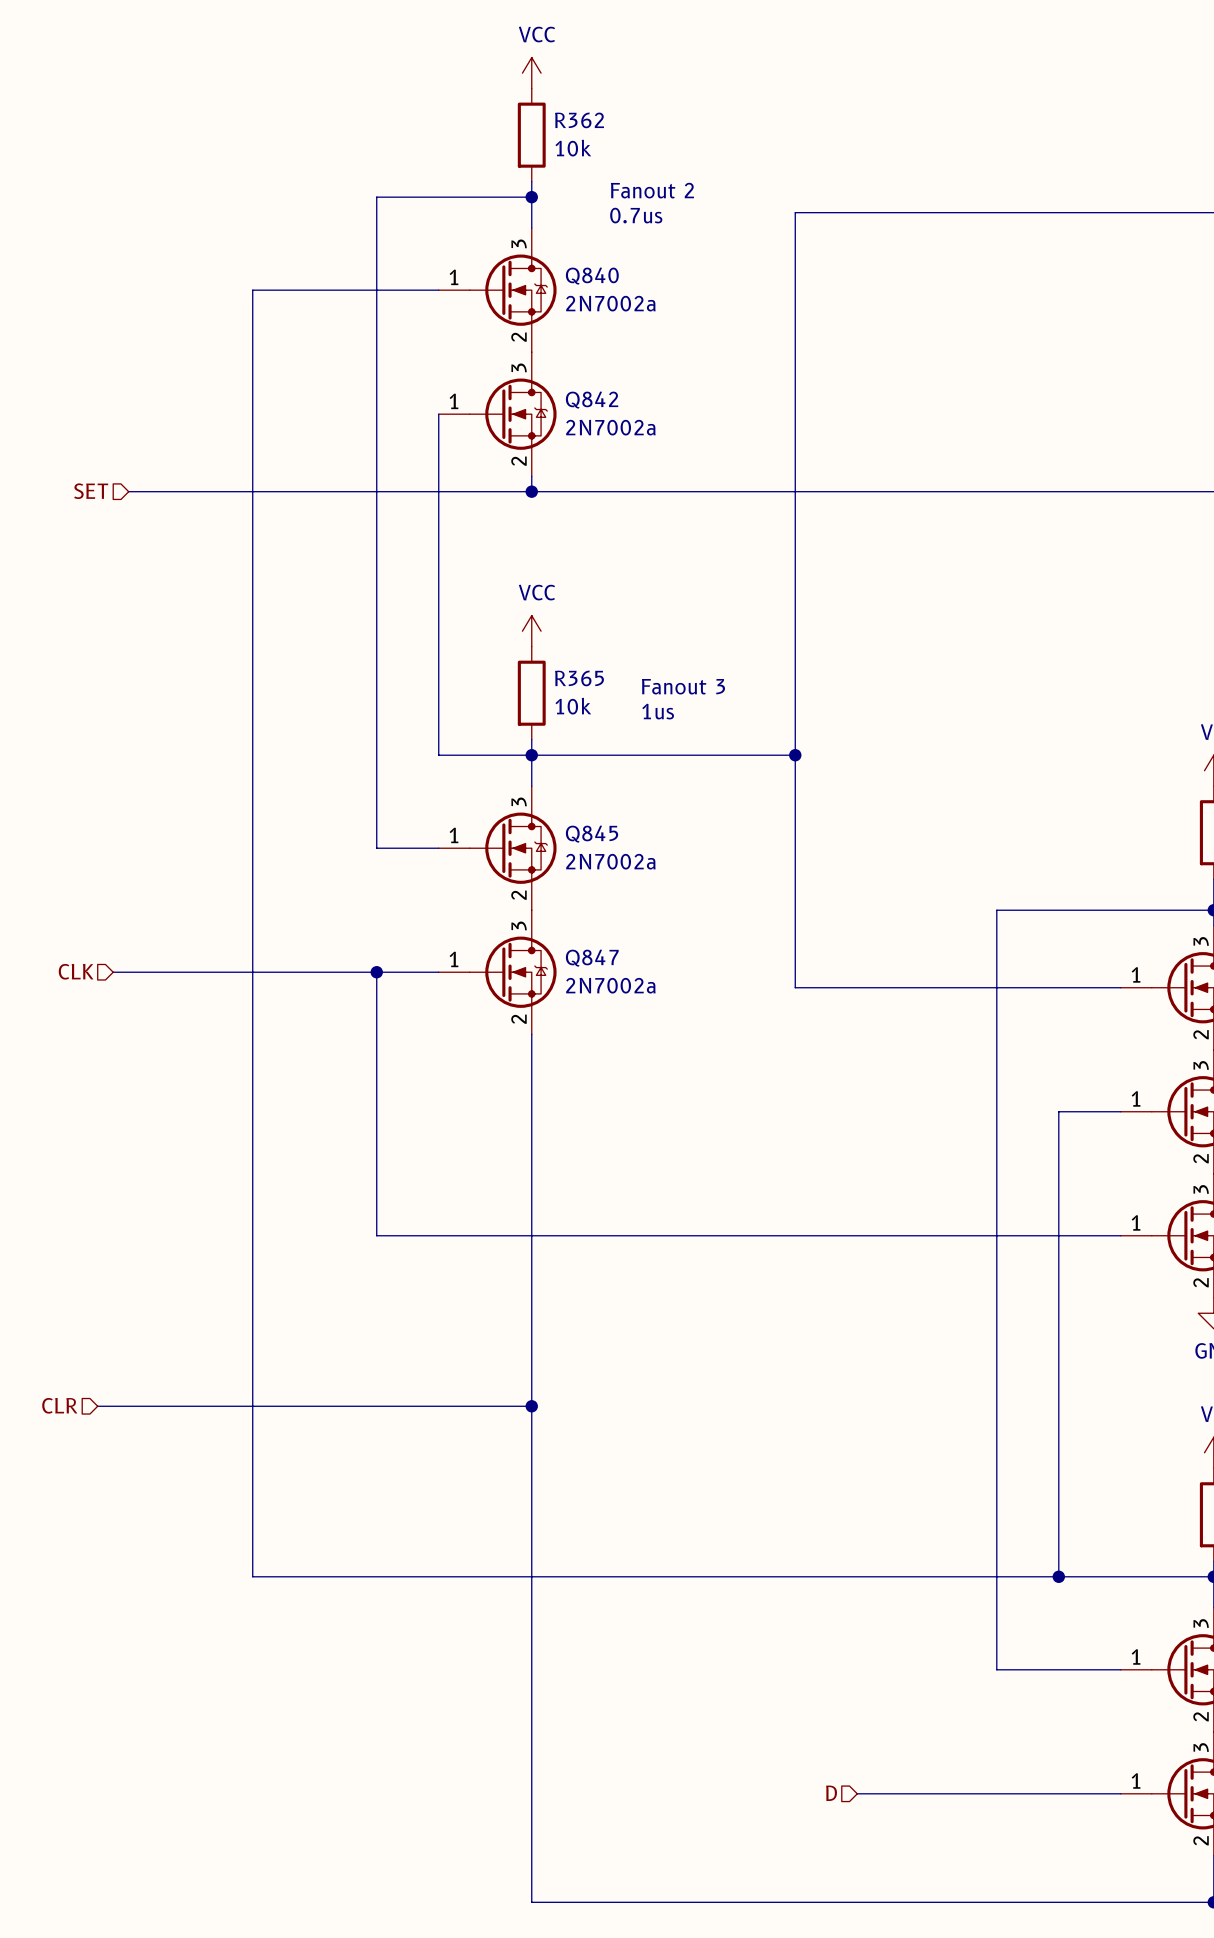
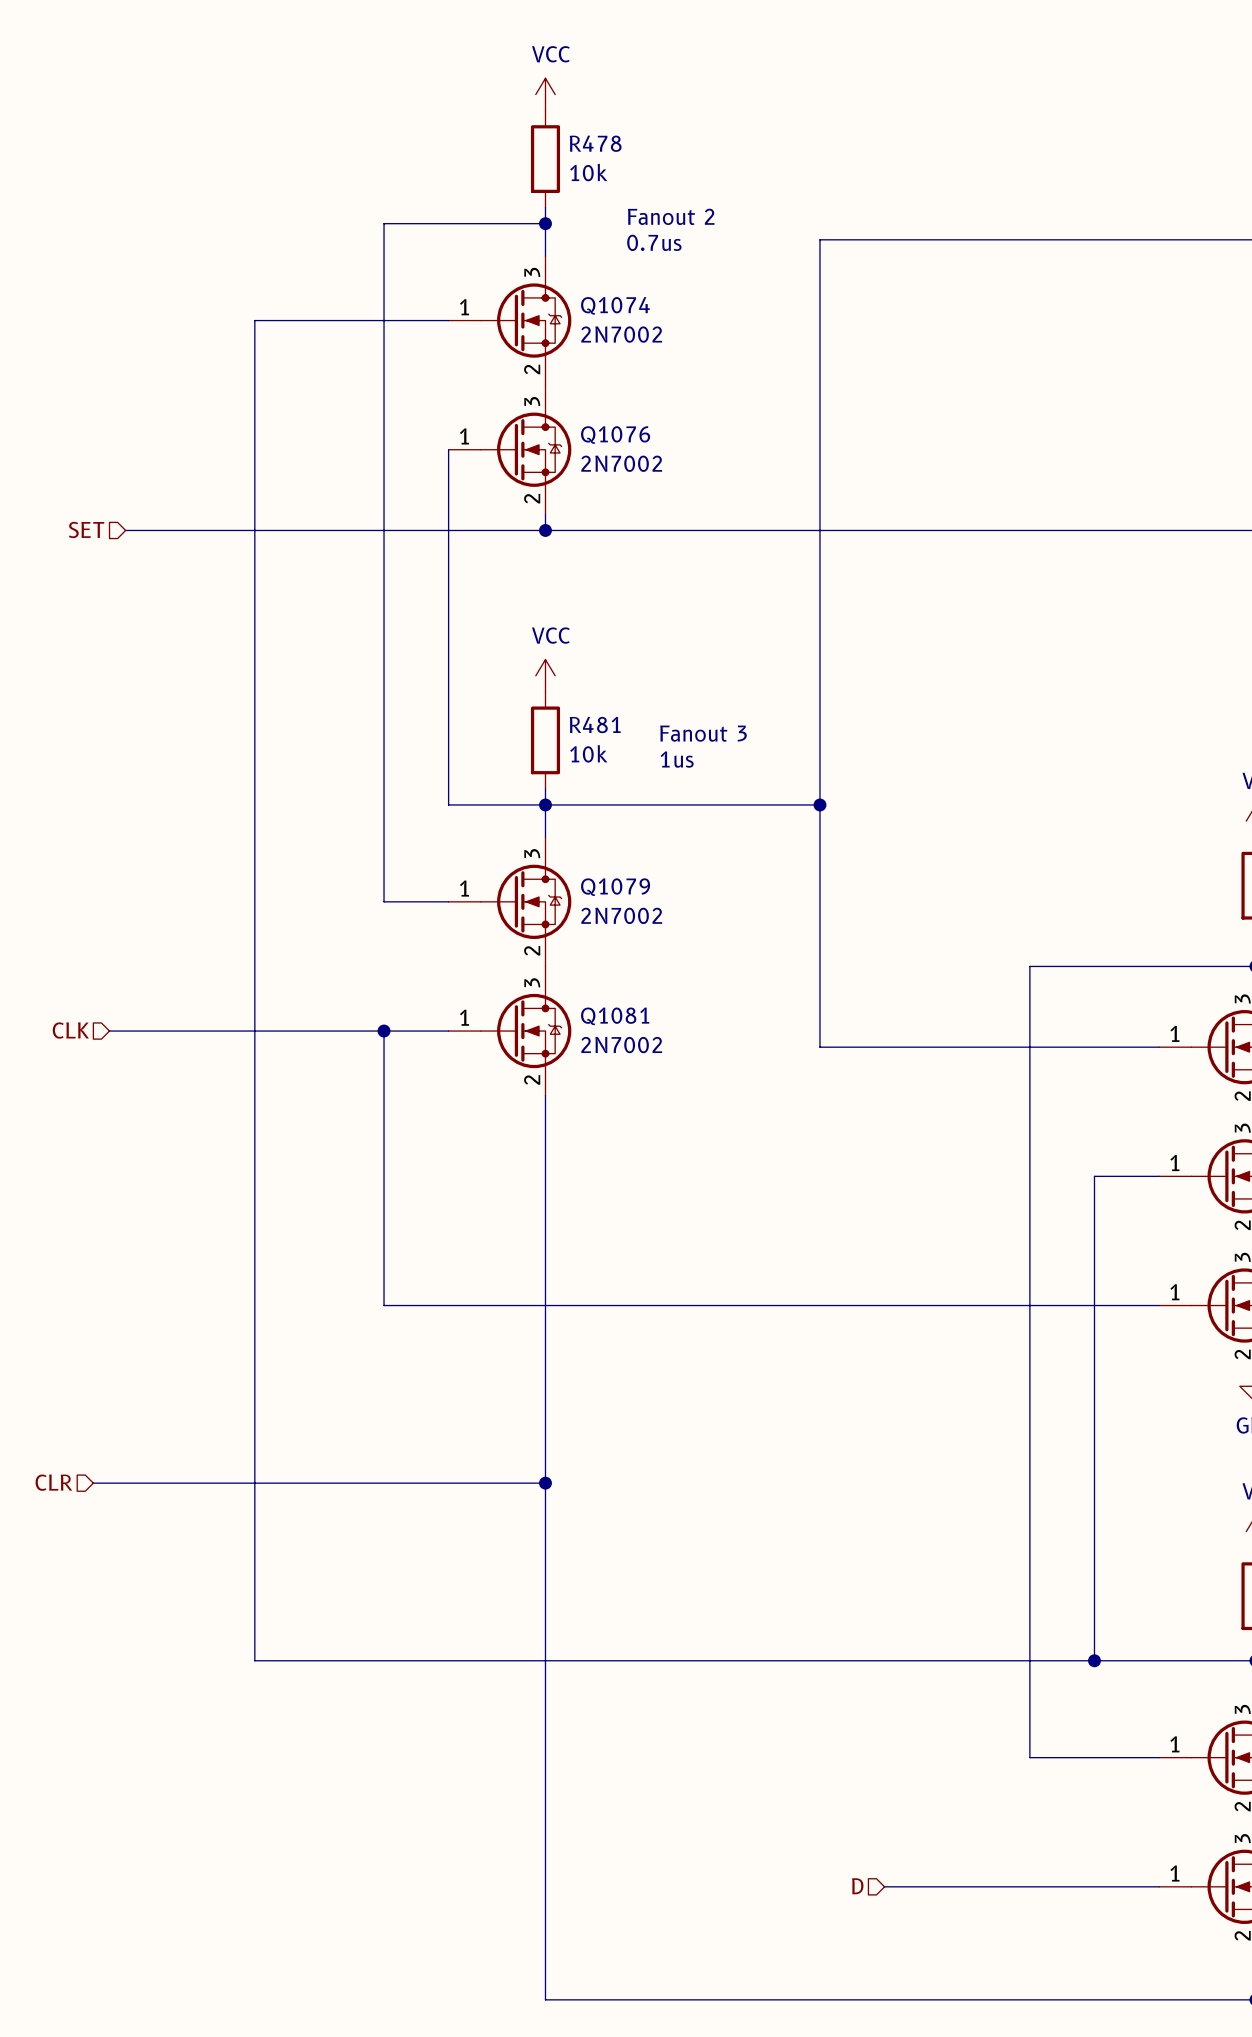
R362 name: R362 (579, 120) -> R478 (595, 143)
Q840 name: Q840 (592, 276) -> Q1074 (615, 305)
Q840 value: 2N7002a (610, 303) -> 2N7002 (621, 334)
Q842 name: Q842 (592, 400) -> Q1076 (615, 435)
Q842 value: 2N7002a (610, 427) -> 2N7002 (621, 463)
R365 name: R365 (579, 678) -> R481 (595, 725)
Q845 name: Q845 (592, 834) -> Q1079 (615, 887)
Q845 value: 2N7002a (610, 861) -> 2N7002 (621, 915)
Q847 name: Q847 (592, 958) -> Q1081 (615, 1016)
Q847 value: 2N7002a (610, 985) -> 2N7002 (621, 1045)

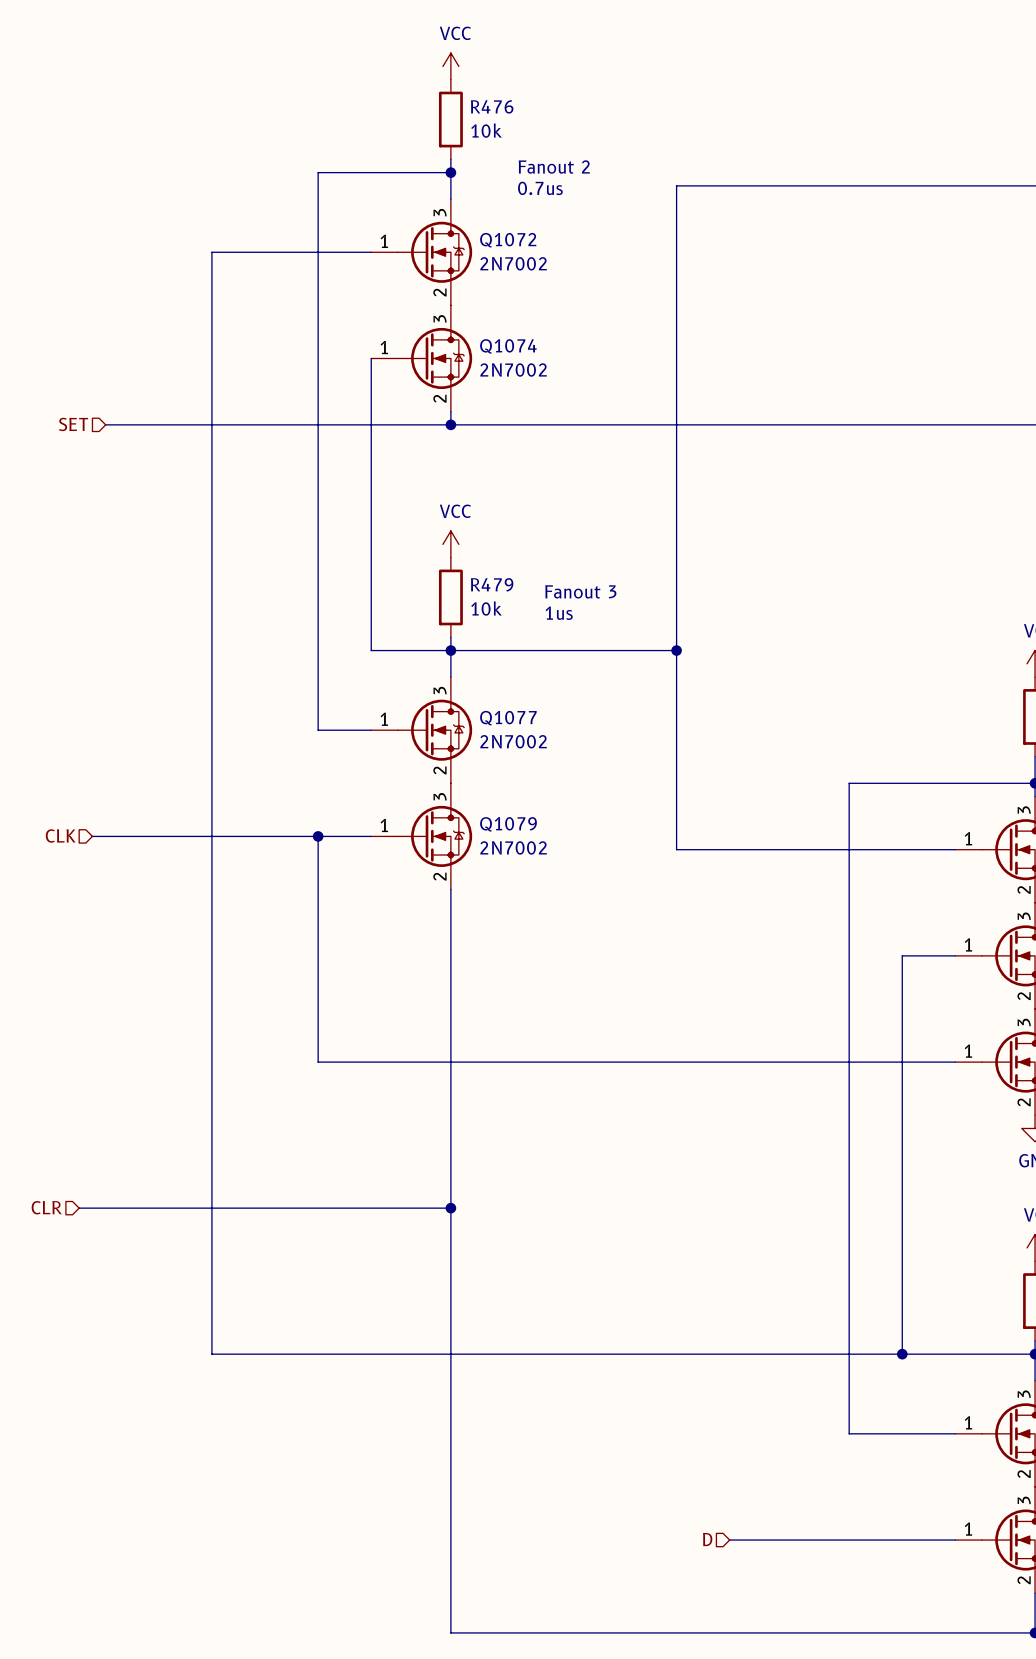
R478 name: R478 (595, 143) -> R476 (492, 106)
Q1074 name: Q1074 (615, 305) -> Q1072 (508, 240)
Q1076 name: Q1076 (615, 435) -> Q1074 (508, 346)
R481 name: R481 (595, 725) -> R479 (492, 584)
Q1079 name: Q1079 (615, 887) -> Q1077 (508, 718)
Q1081 name: Q1081 (615, 1016) -> Q1079 (508, 824)

